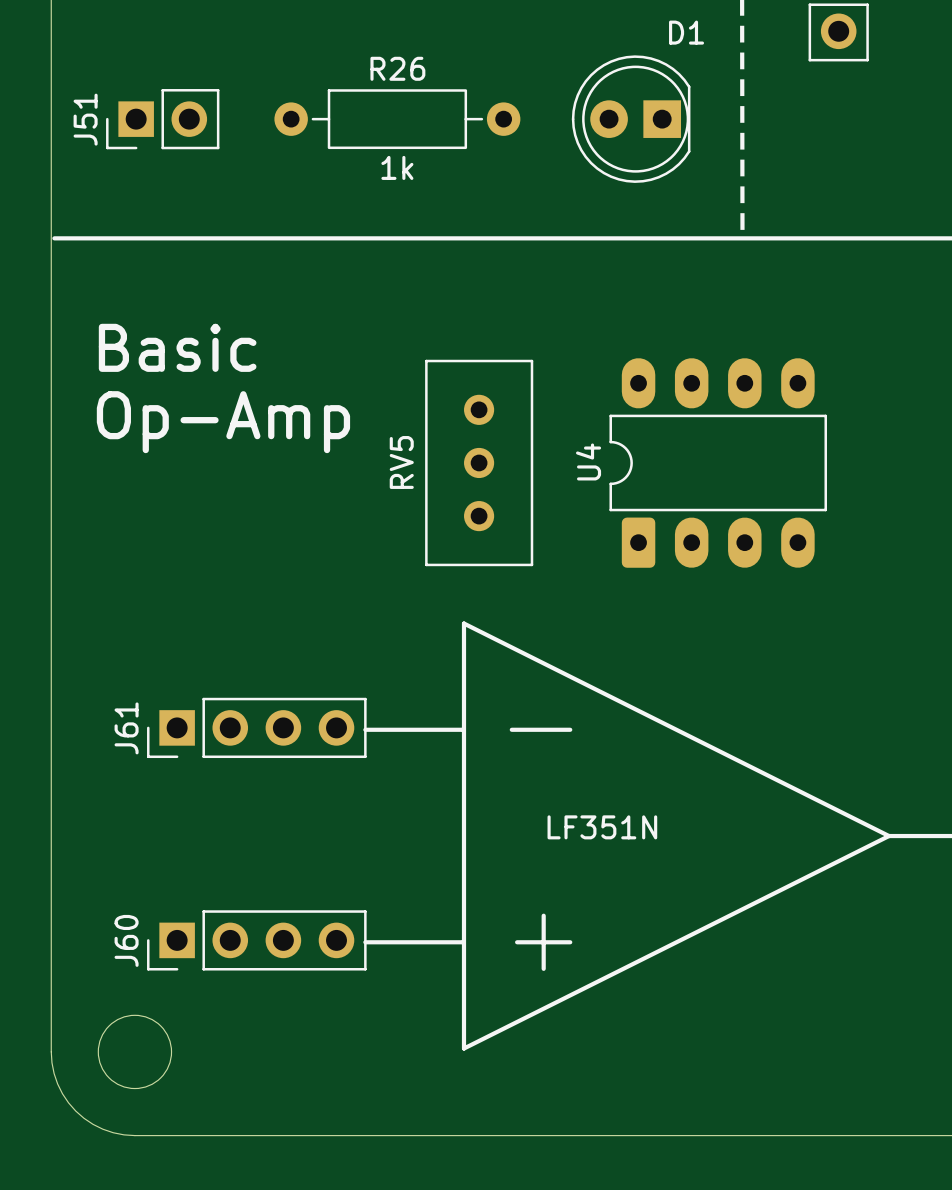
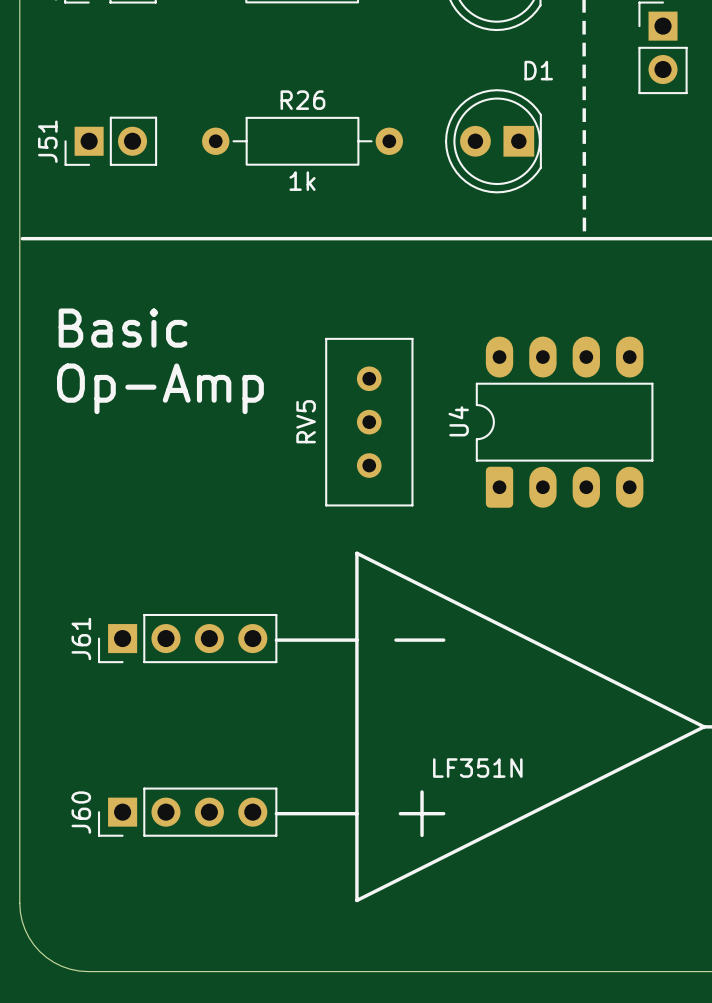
U4 value position: LF351N (602, 827) -> LF351N (477, 768)
round board edge: [97, 1014, 173, 1090] -> none

